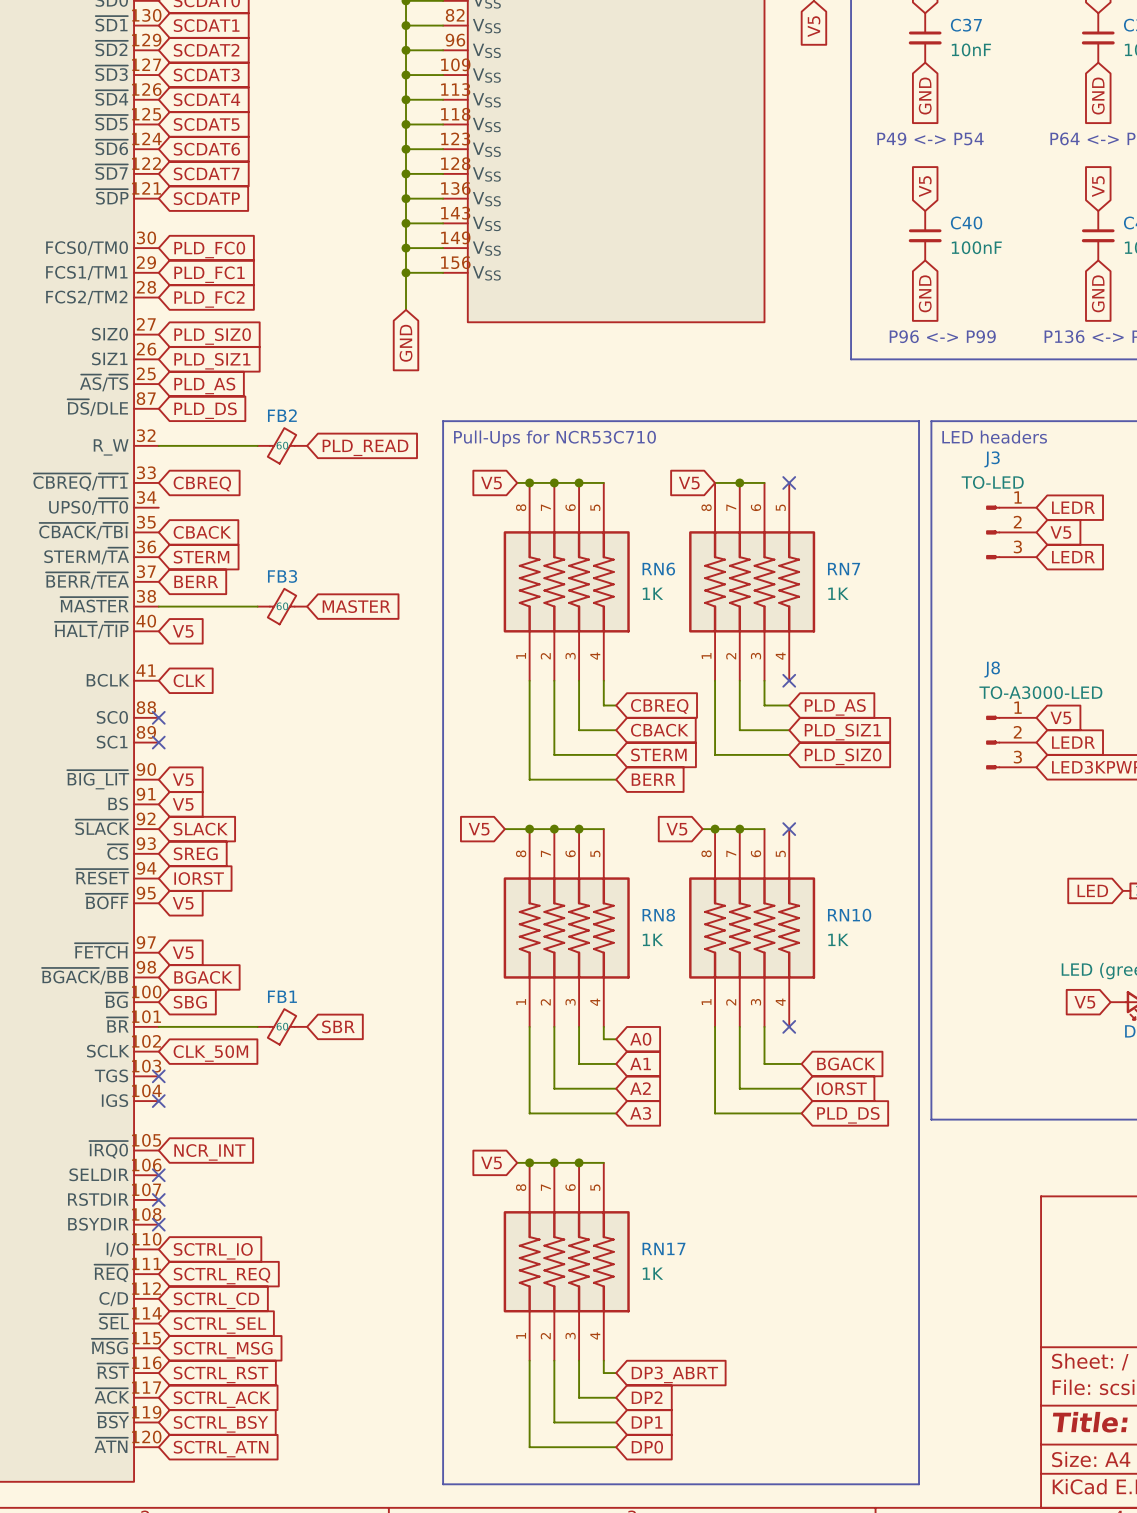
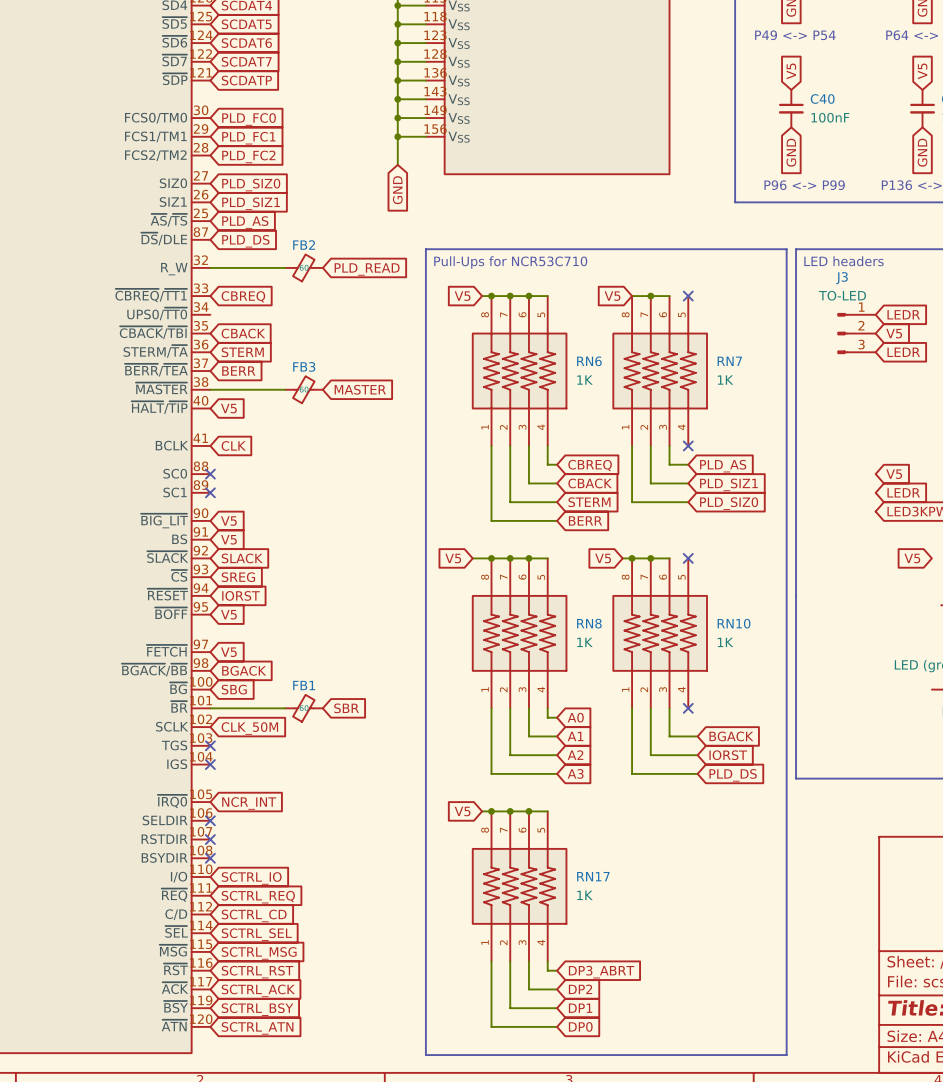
J8: TO-A3000-LED (1011, 742) -> none
global label: none -> V5 (912, 558)
global label: LED (1092, 890) -> none
global label: V5 (1084, 1002) -> none

